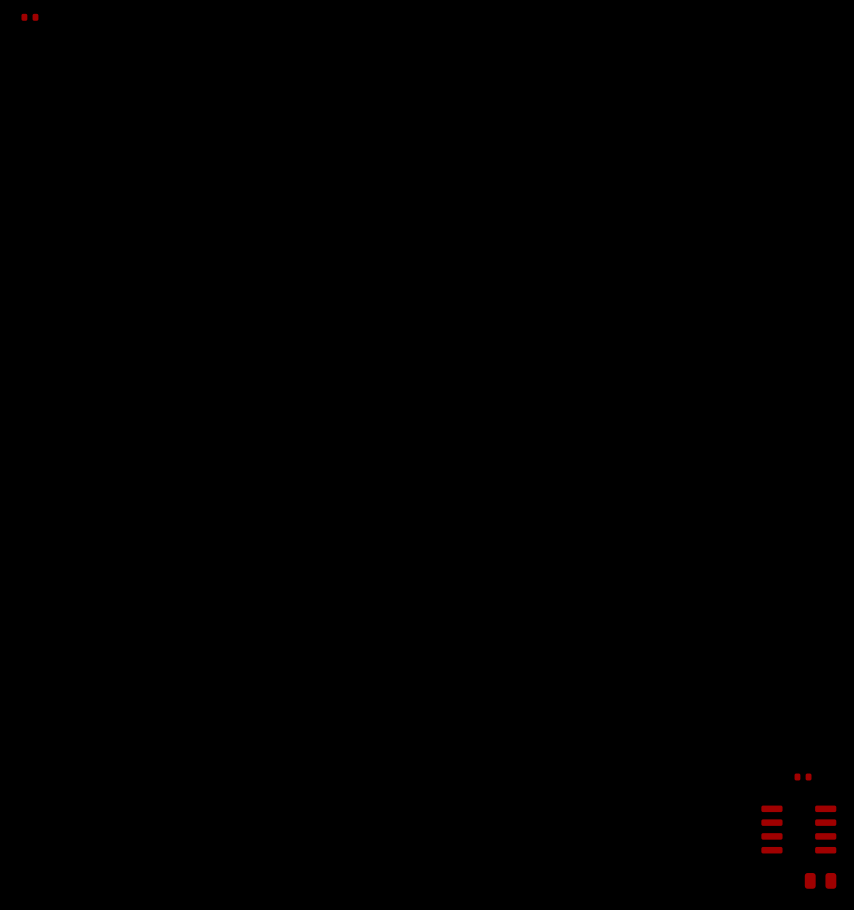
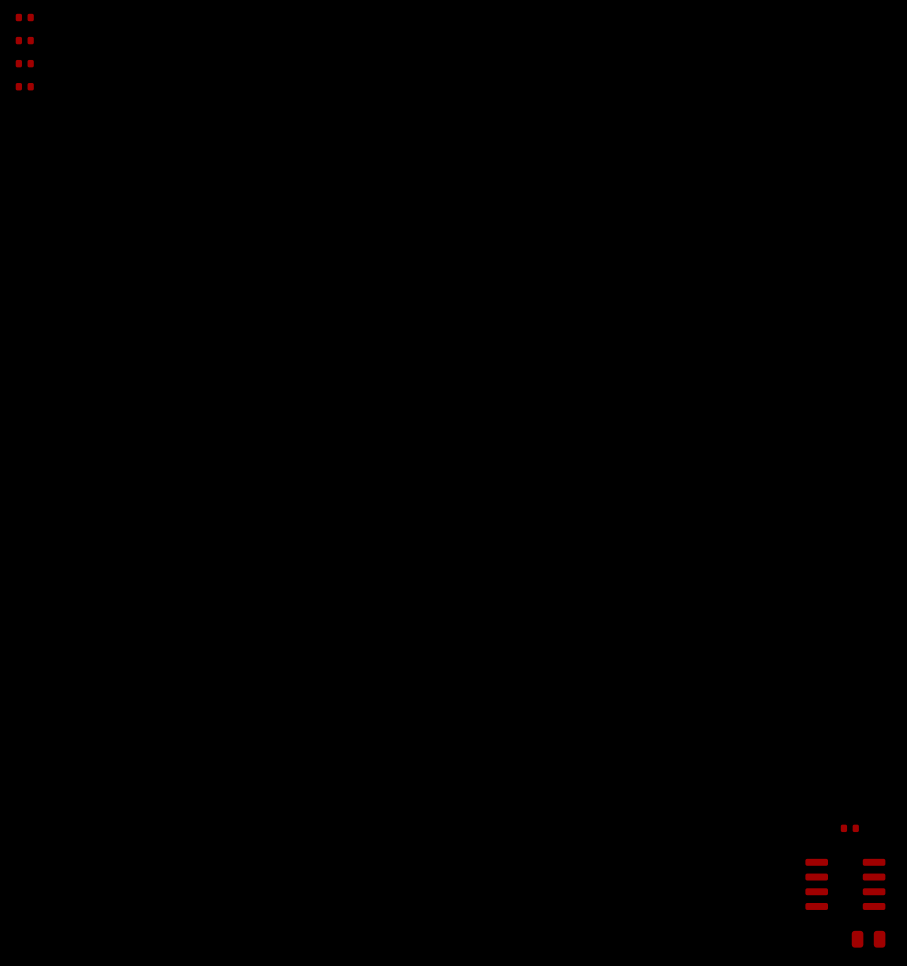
part: none -> (24, 40)
part: none -> (24, 63)
part: none -> (24, 86)

